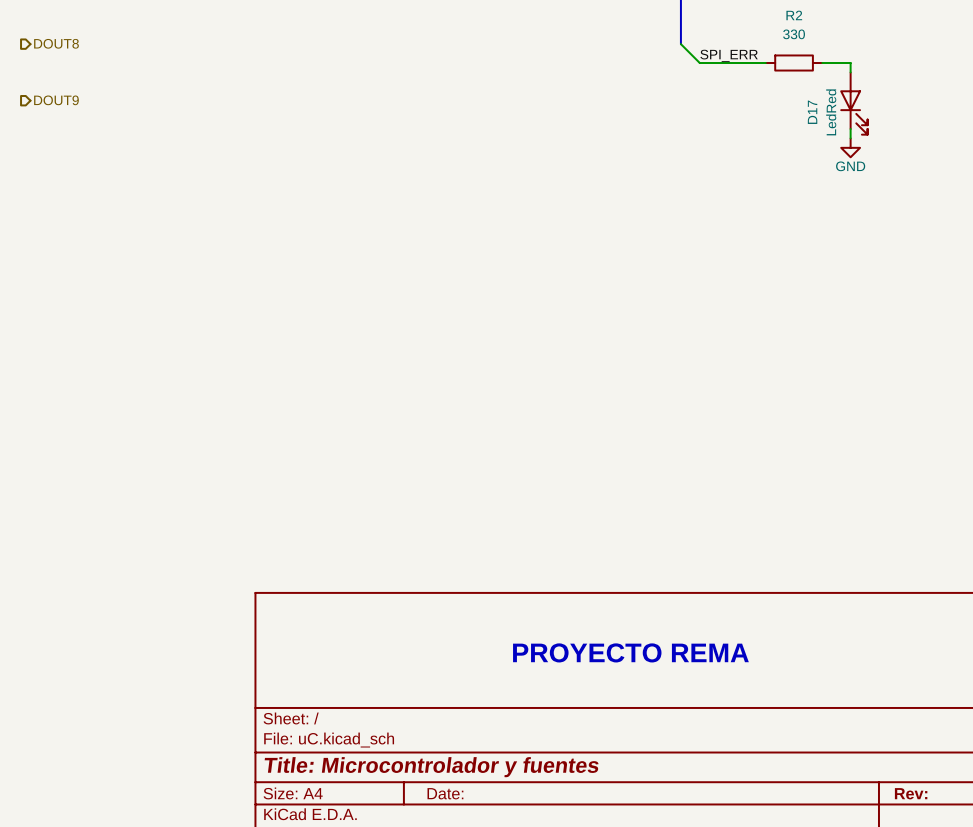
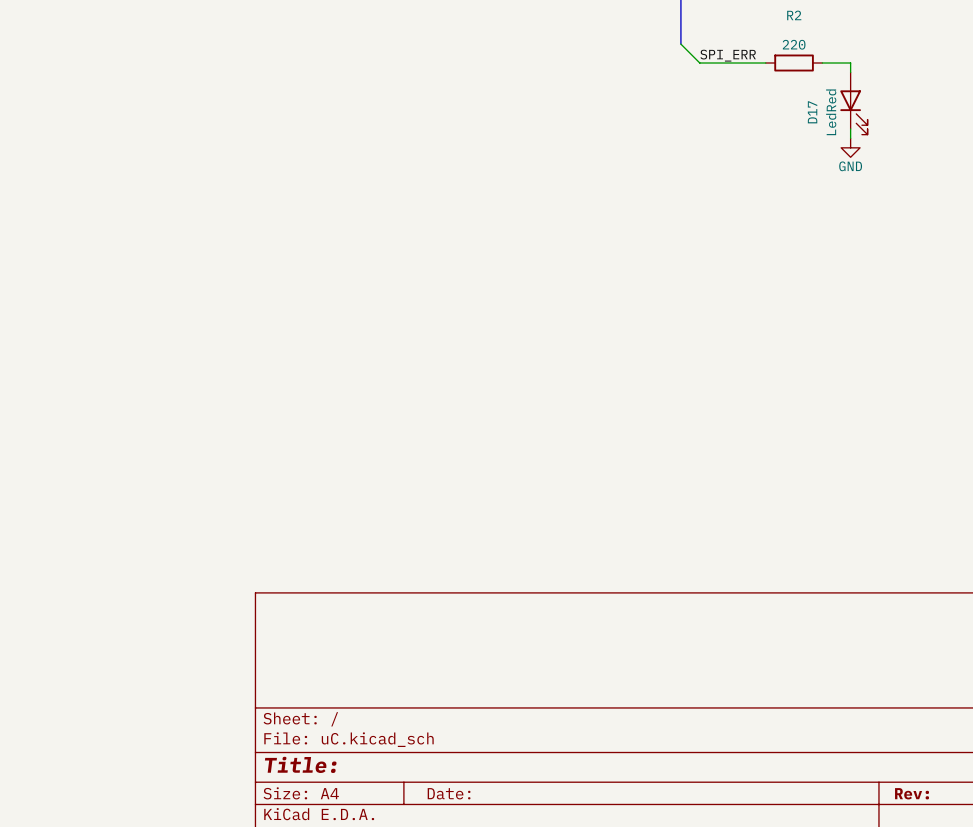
R2 value: 330 (794, 34) -> 220 (794, 44)
hierarchical label: DOUT8 (56, 43) -> none
hierarchical label: DOUT9 (56, 100) -> none
text: PROYECTO REMA (630, 652) -> none
title block: Title: Microcontrolador y fuentes (431, 767) -> Title: (300, 764)

